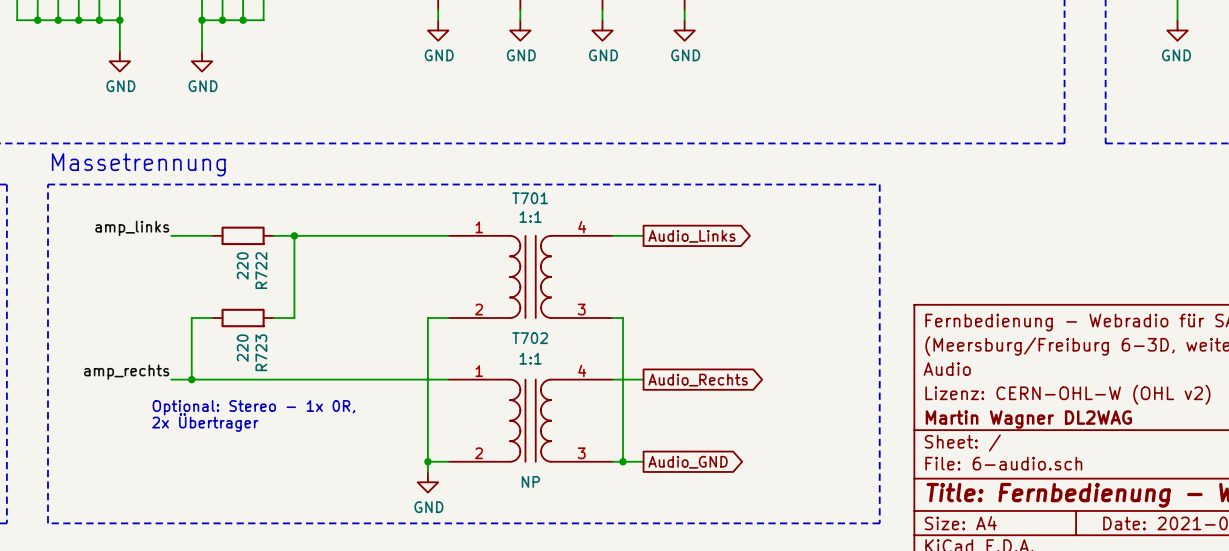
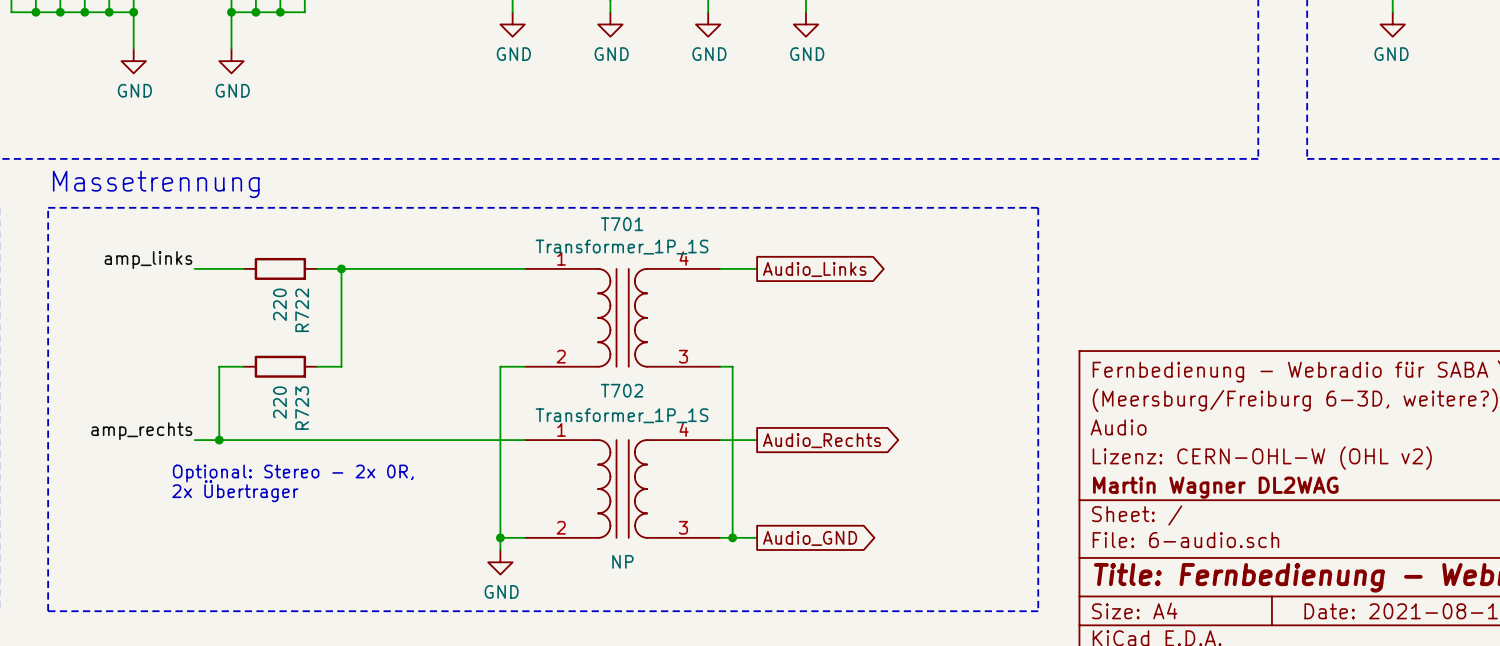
T701 value: 1:1 (530, 216) -> Transformer_1P_1S (622, 247)
T702 value: 1:1 (530, 358) -> Transformer_1P_1S (622, 415)
text: Optional: Stereo - 1x 0R, (253, 407) -> Optional: Stereo - 2x 0R, (293, 473)

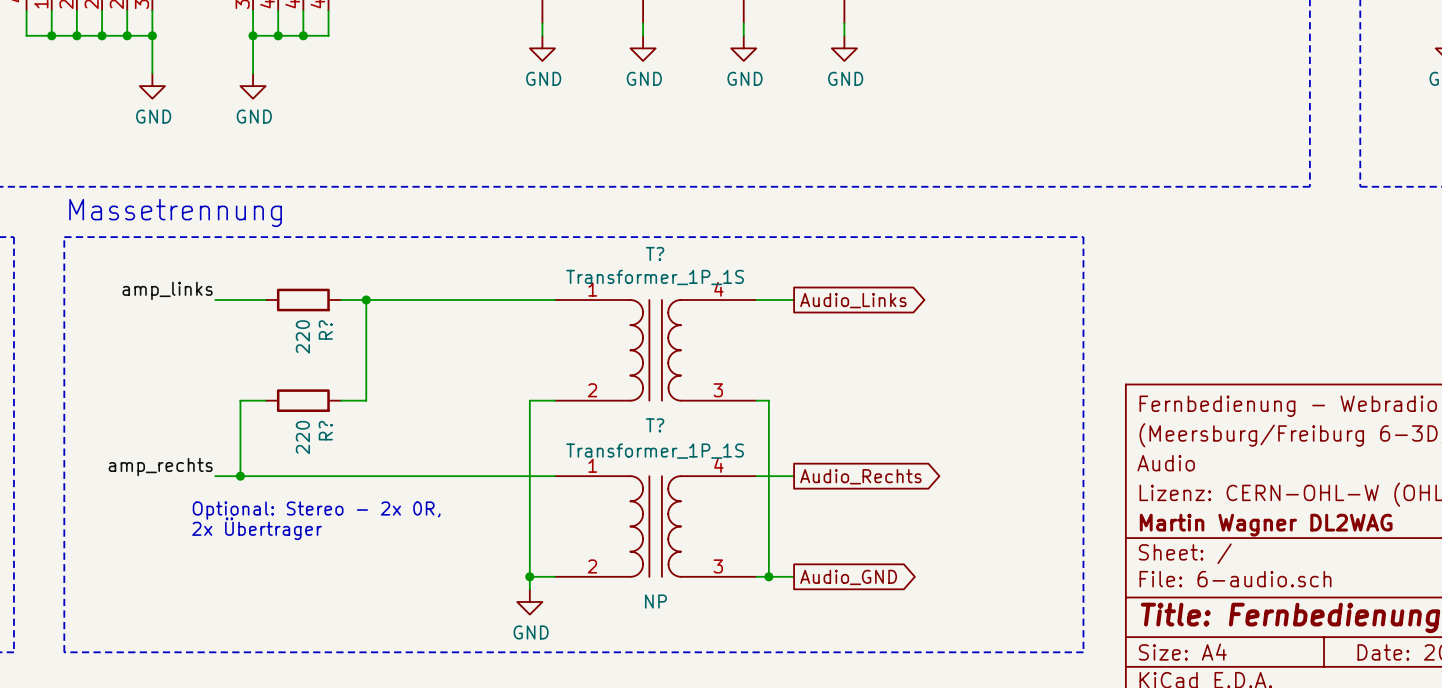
T701 name: T701 (622, 224) -> T? (655, 253)
R722 name: R722 (302, 310) -> R? (325, 330)
T702 name: T702 (622, 390) -> T? (655, 425)
R723 name: R723 (302, 408) -> R? (325, 430)

